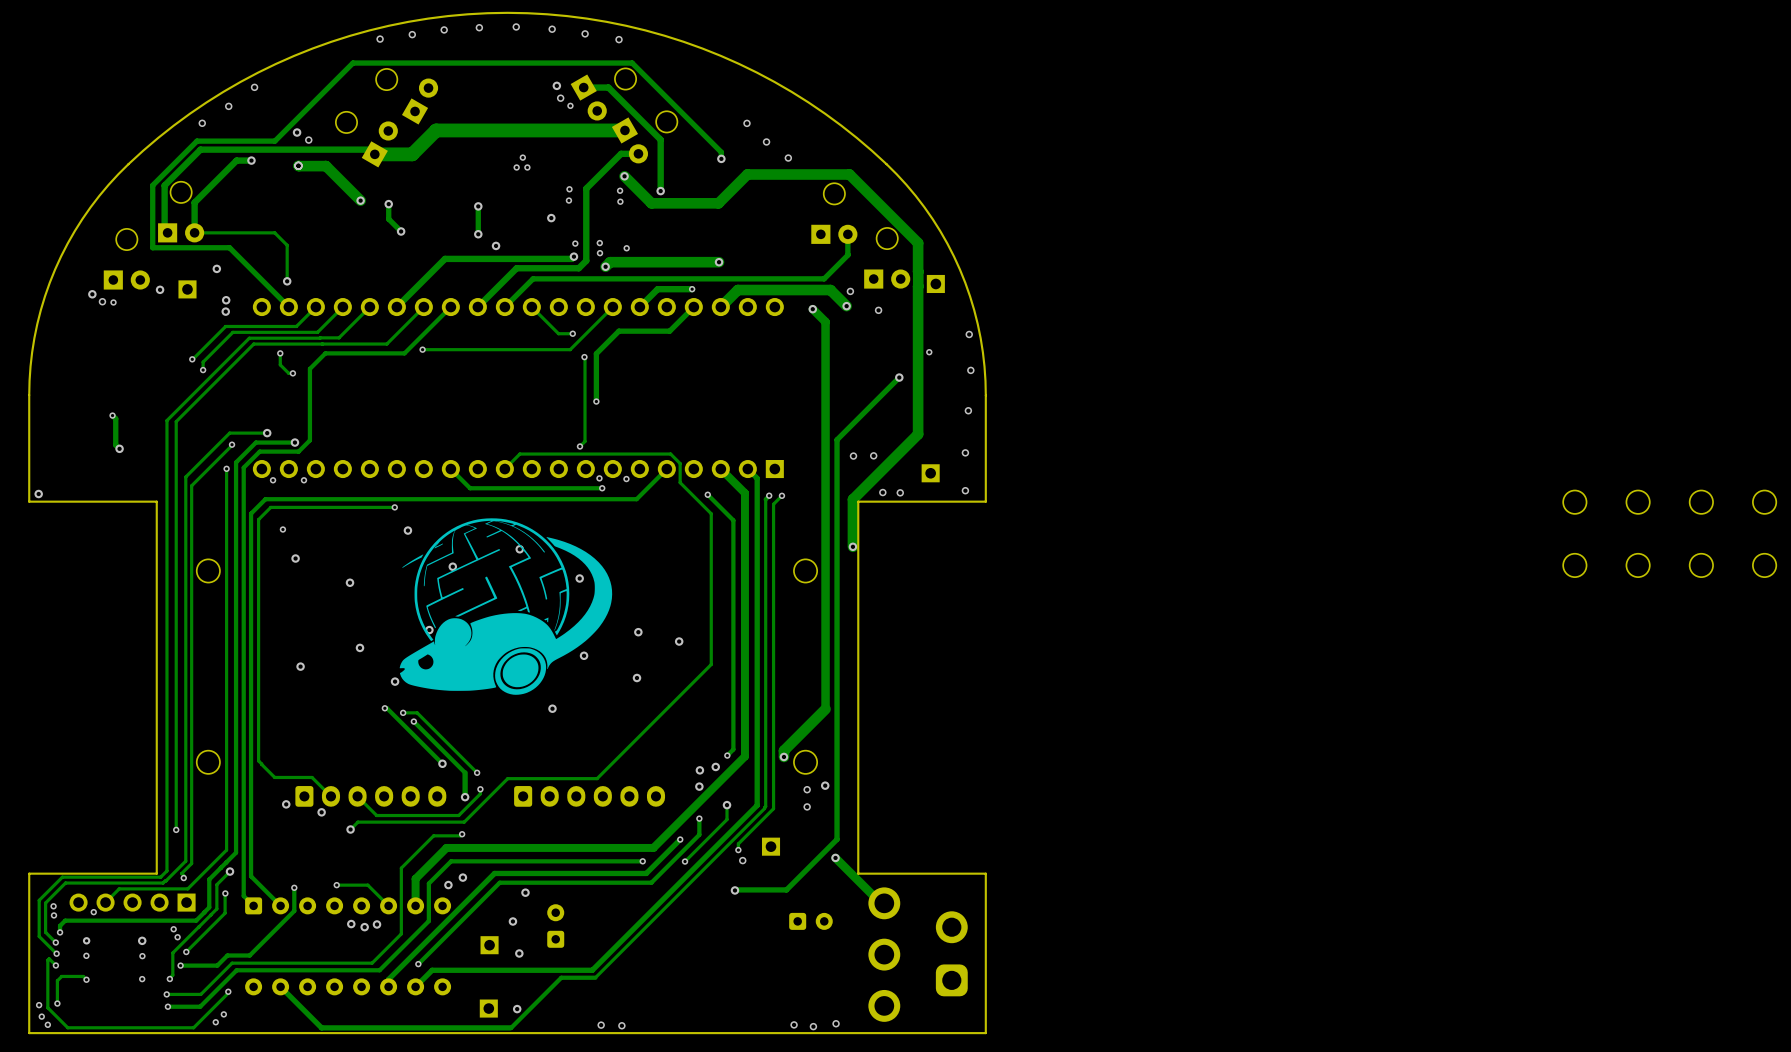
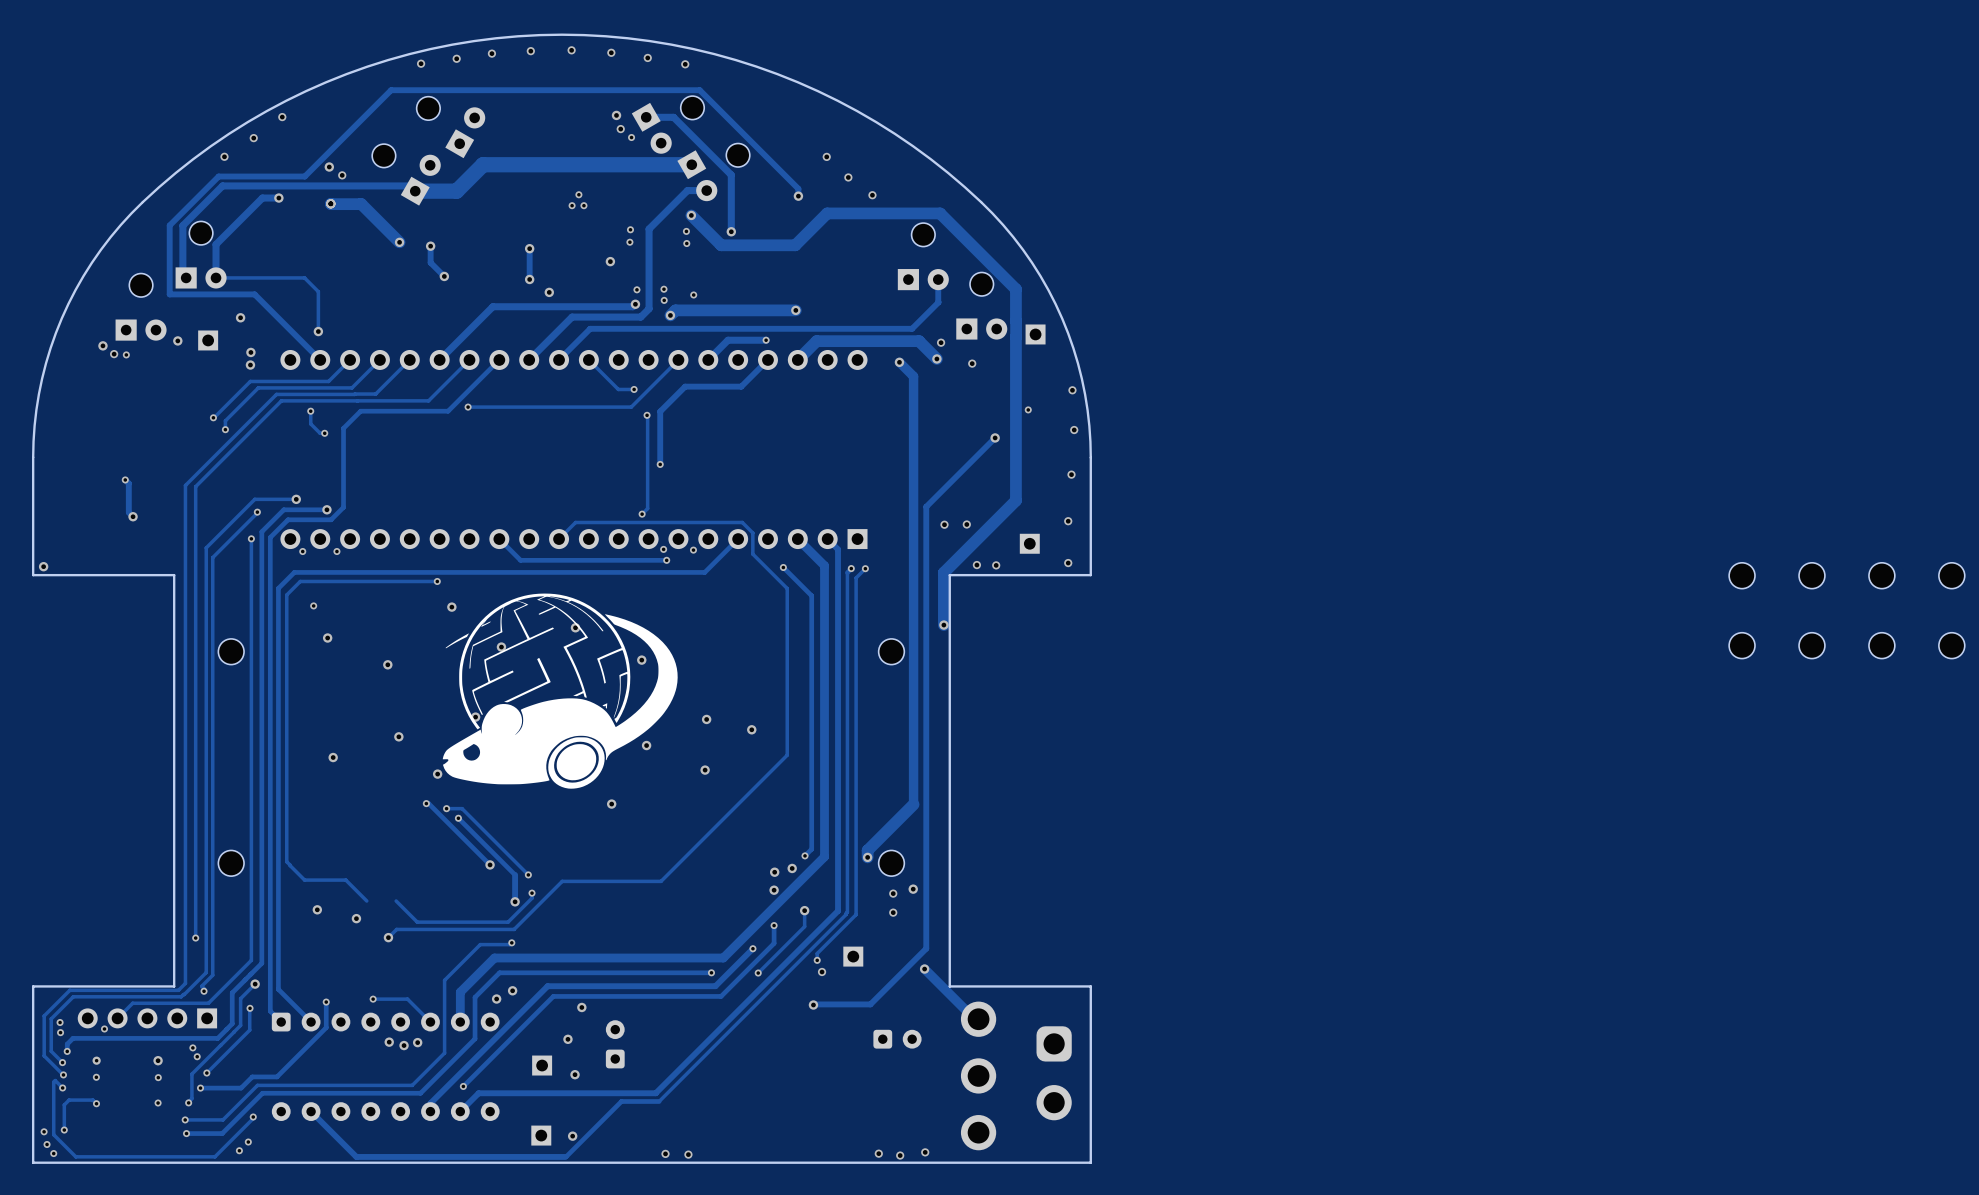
part: (370, 796) -> none
part: (589, 796) -> none
part rotation: 0° (951, 953) -> 180° (1054, 1073)

